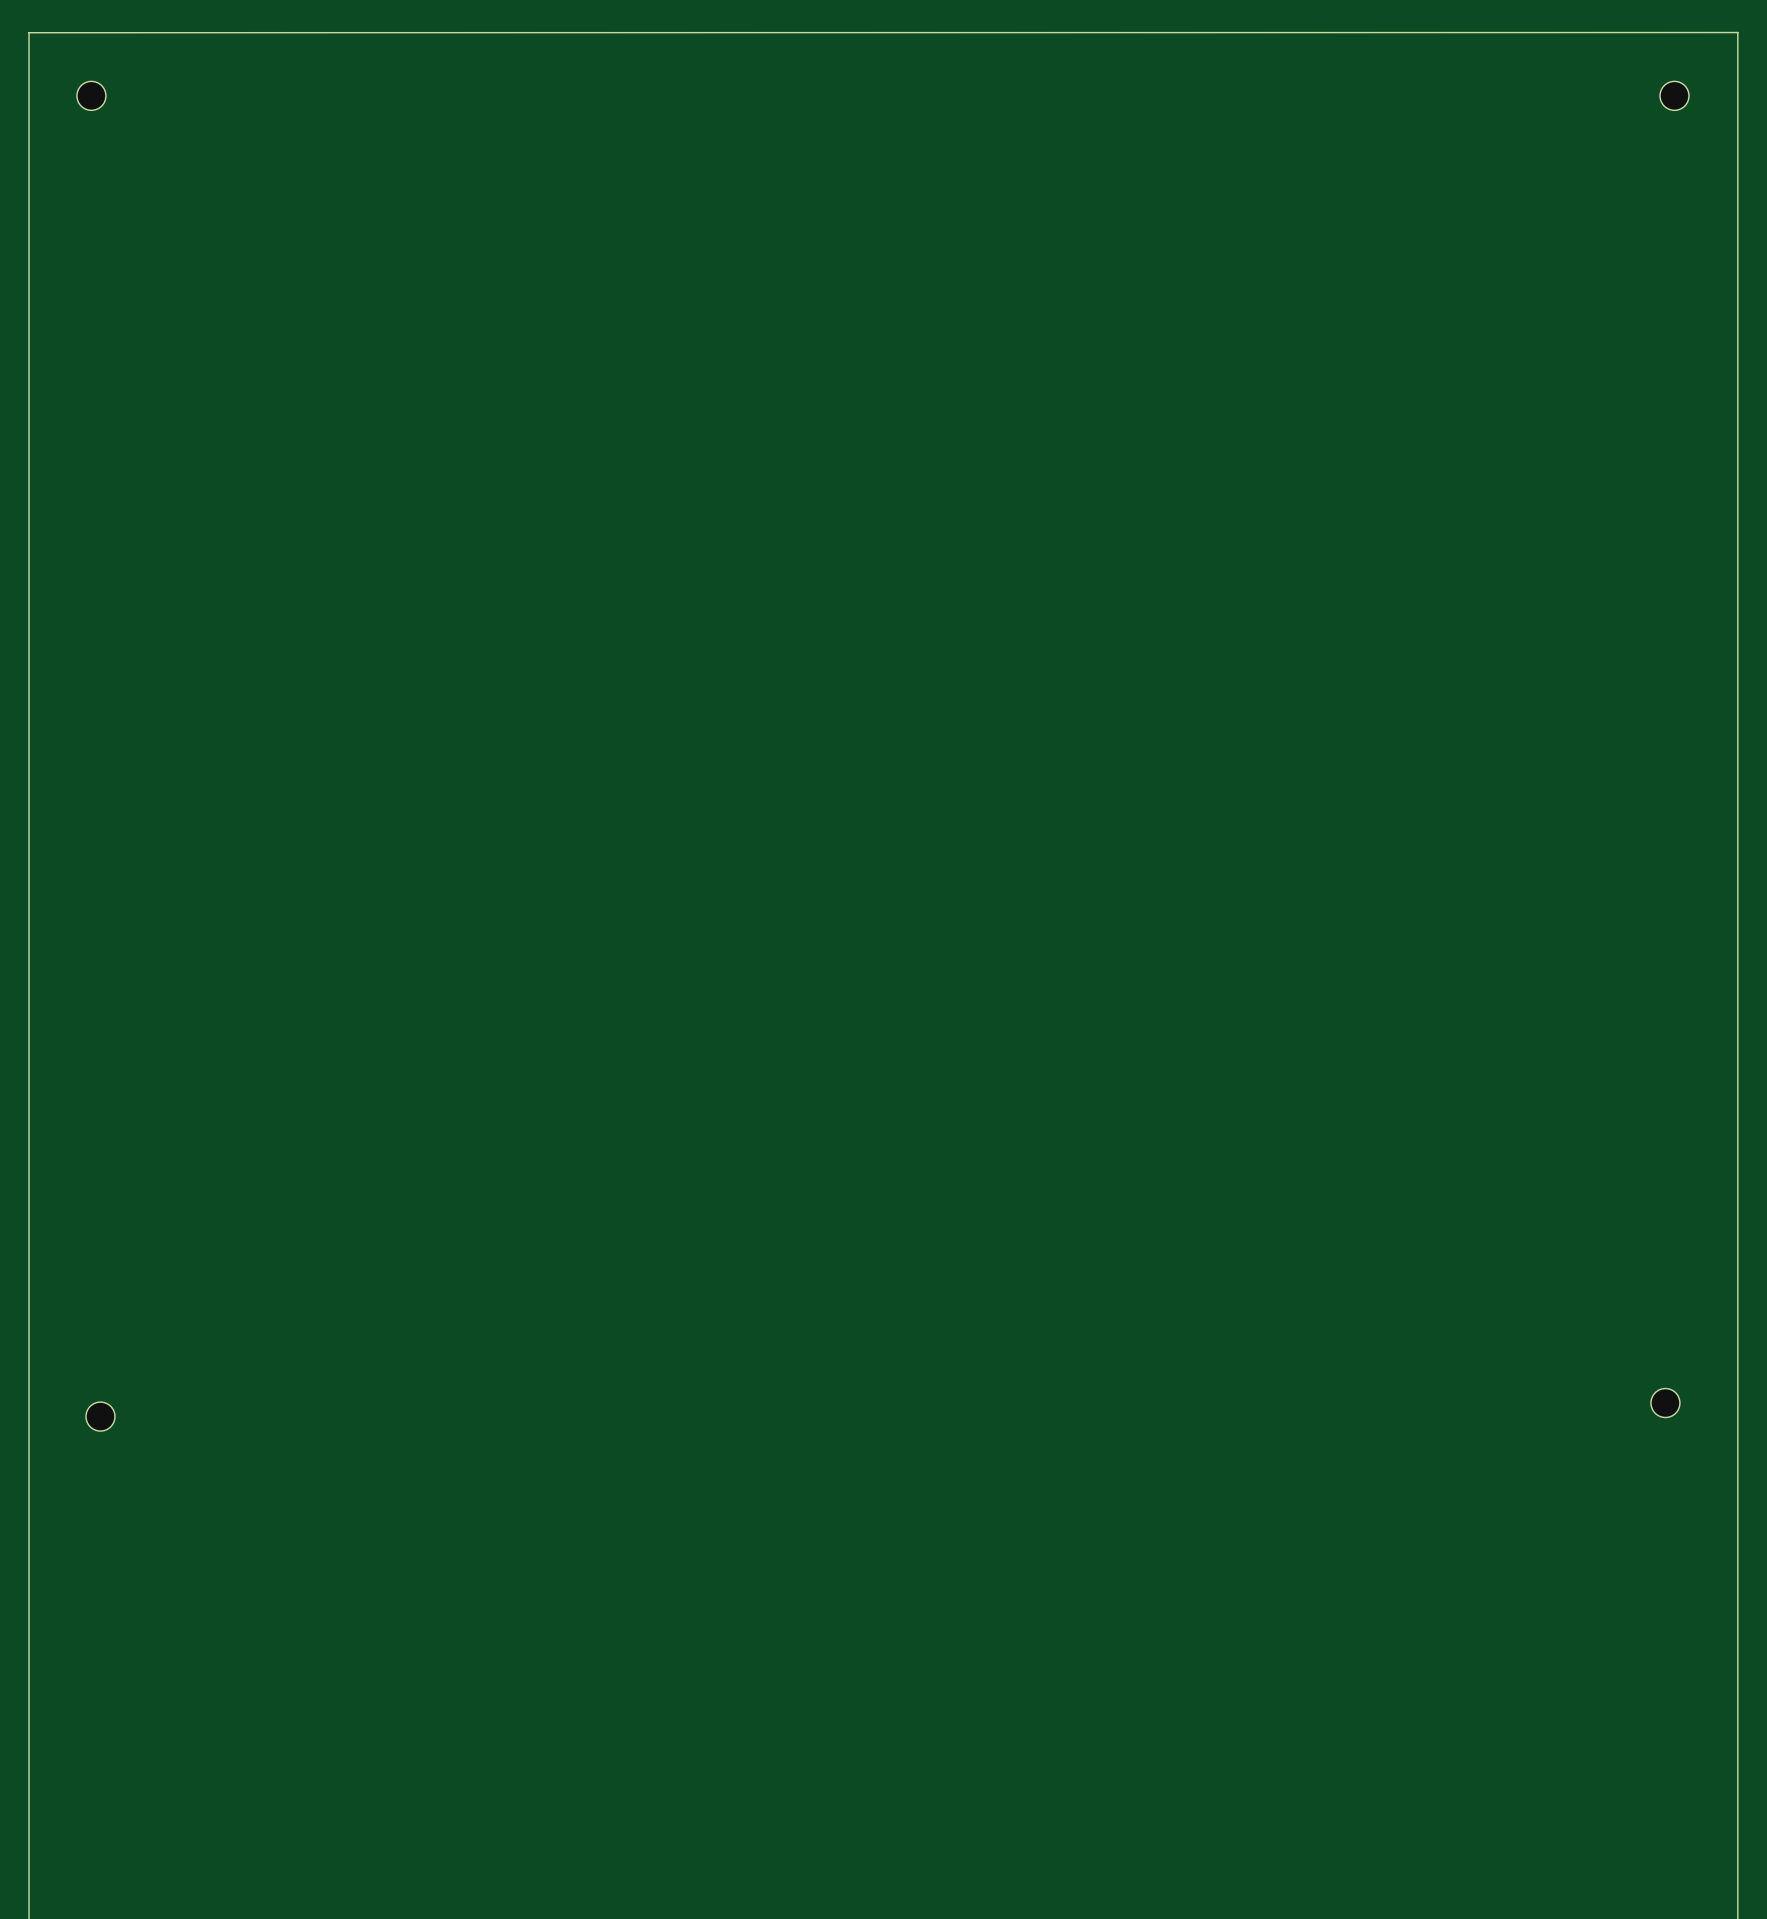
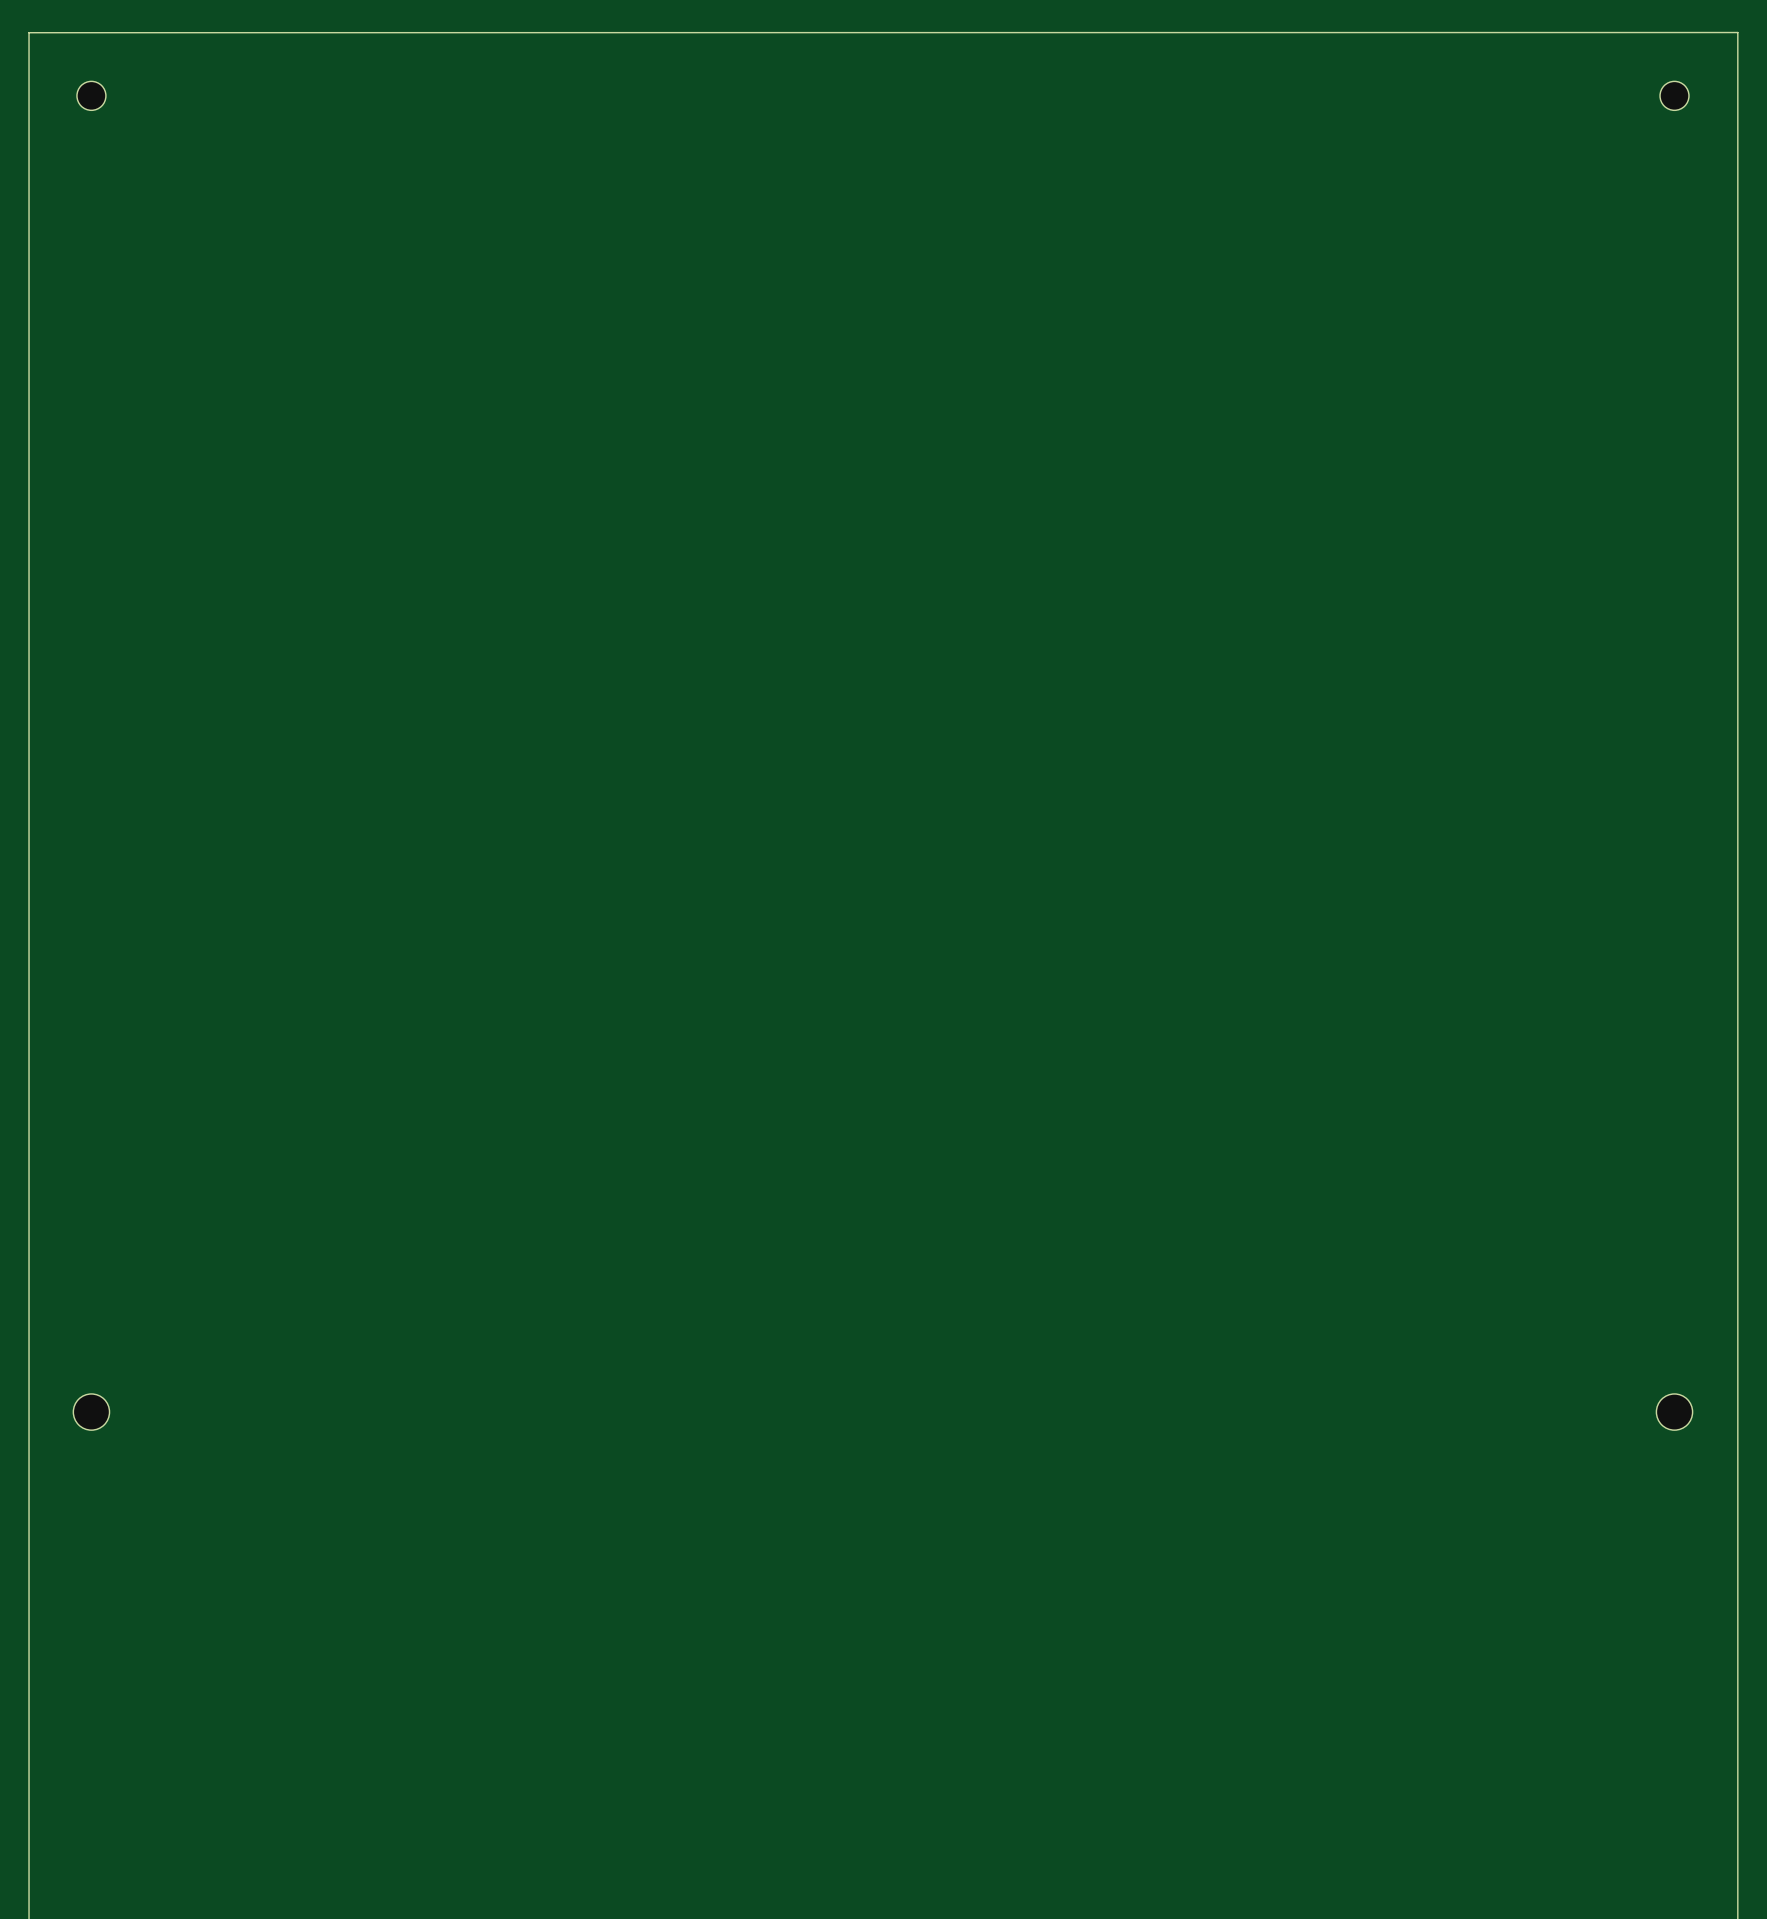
hole: (1665, 1403) -> none
hole: none -> (91, 1412)
hole: none -> (1674, 1412)
hole: (100, 1416) -> none

